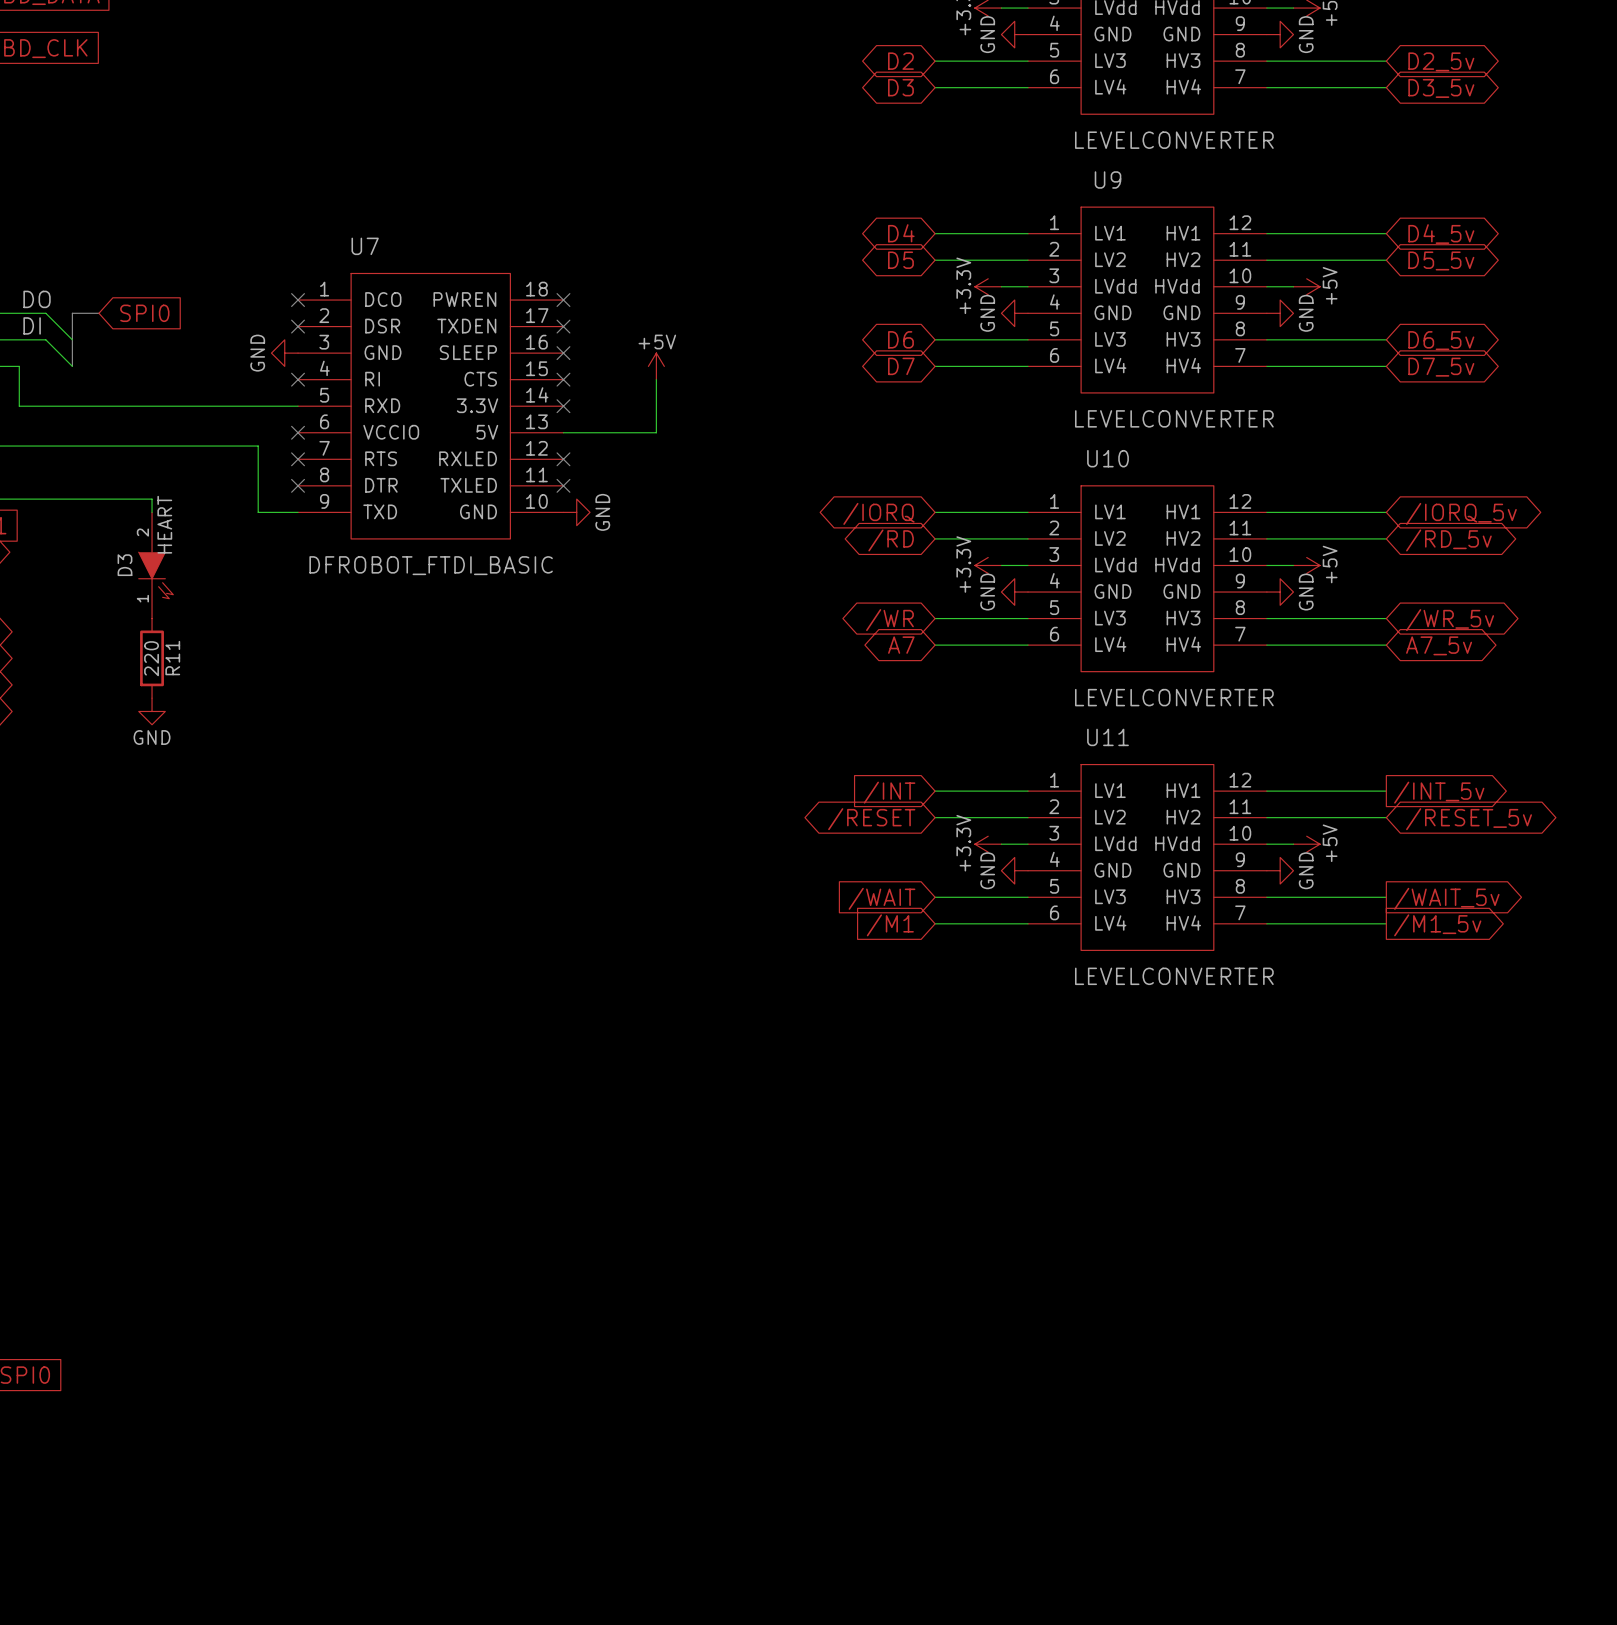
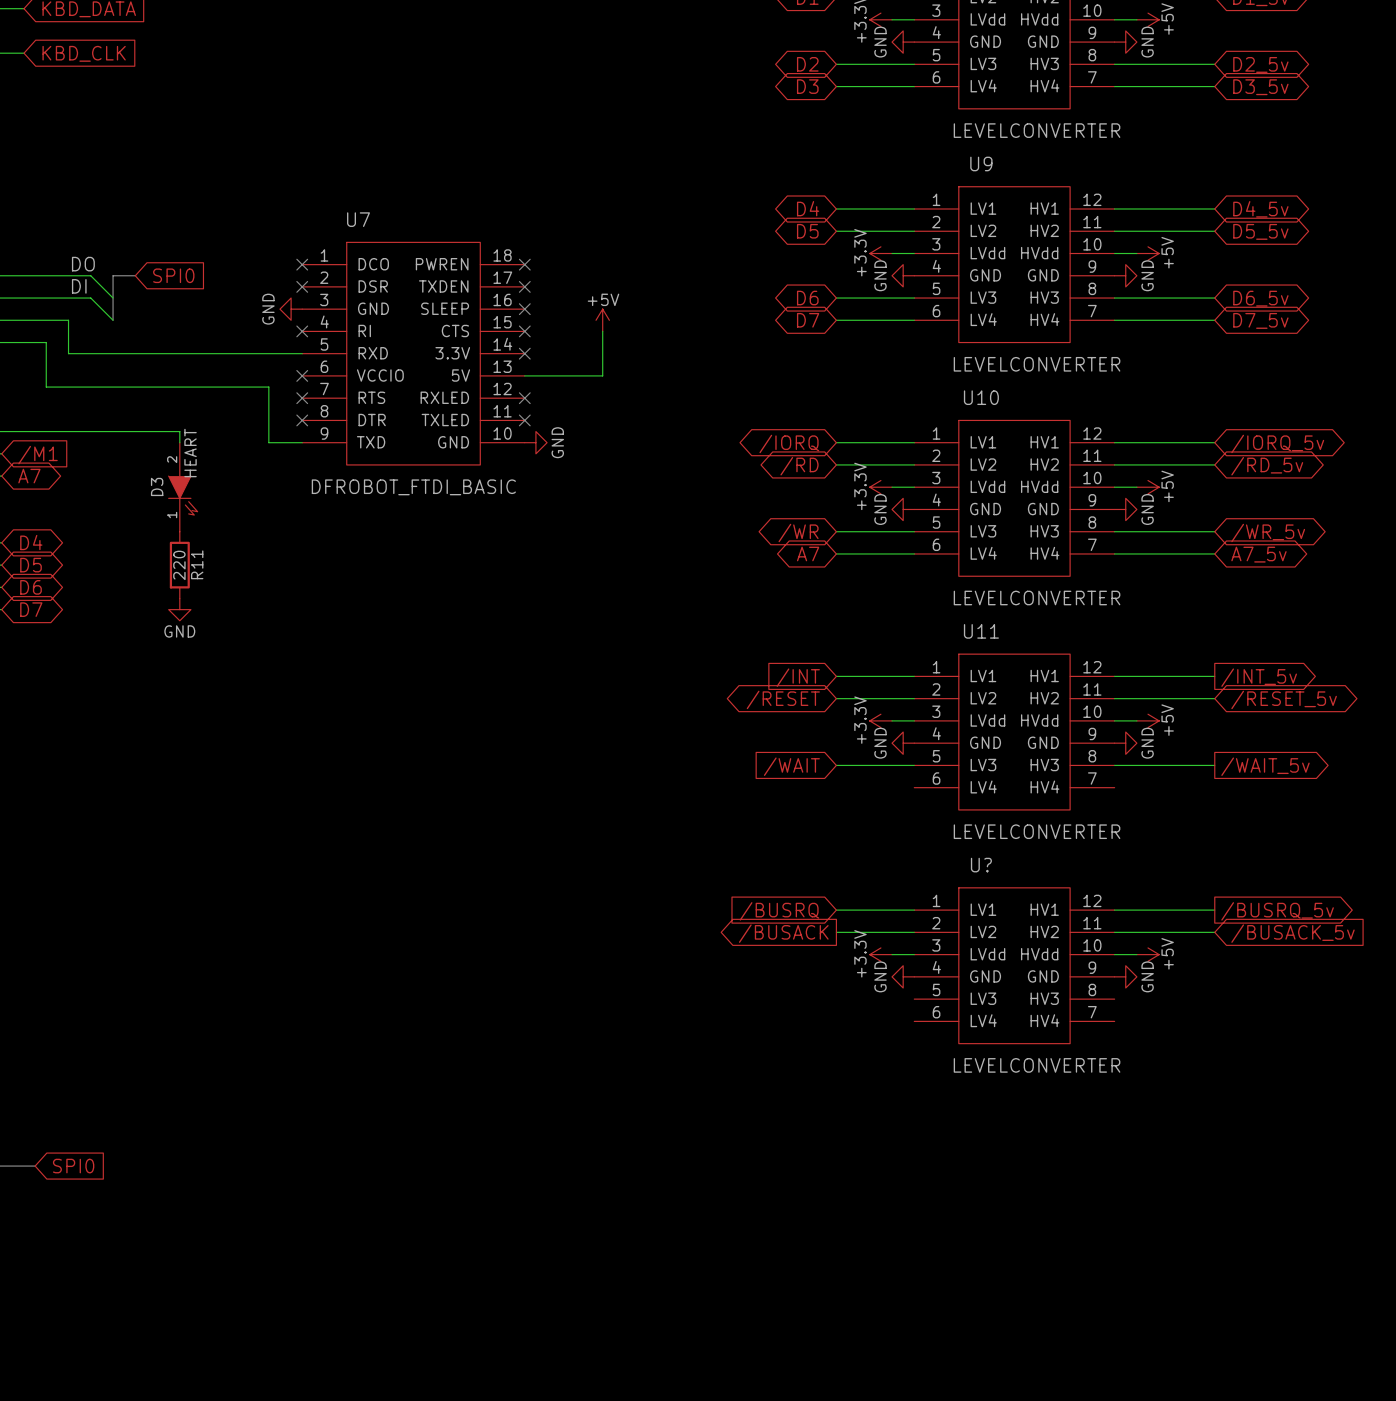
wire: (935, 923) (1028, 923) -> (836, 910) (914, 910)
wire: (1266, 923) (1386, 923) -> (1114, 910) (1214, 910)
global label: /M1 (890, 925) -> none
global label: /M1_5v (1437, 925) -> none
global label: none -> /BUSRQ (779, 911)
global label: none -> /BUSRQ_5v (1277, 911)
wire: none -> (836, 932) (914, 932)
wire: none -> (1114, 932) (1214, 932)
global label: none -> /BUSACK (783, 933)
global label: none -> /BUSACK_5v (1293, 933)
power symbol: none -> +3.3V (880, 954)
wire: none -> (892, 954) (914, 954)
wire: none -> (1114, 954) (1136, 954)
power symbol: none -> +5V (1148, 954)
U?: none -> LEVELCONVERTER (1014, 965)
power symbol: none -> GND (903, 976)
power symbol: none -> GND (1125, 976)

